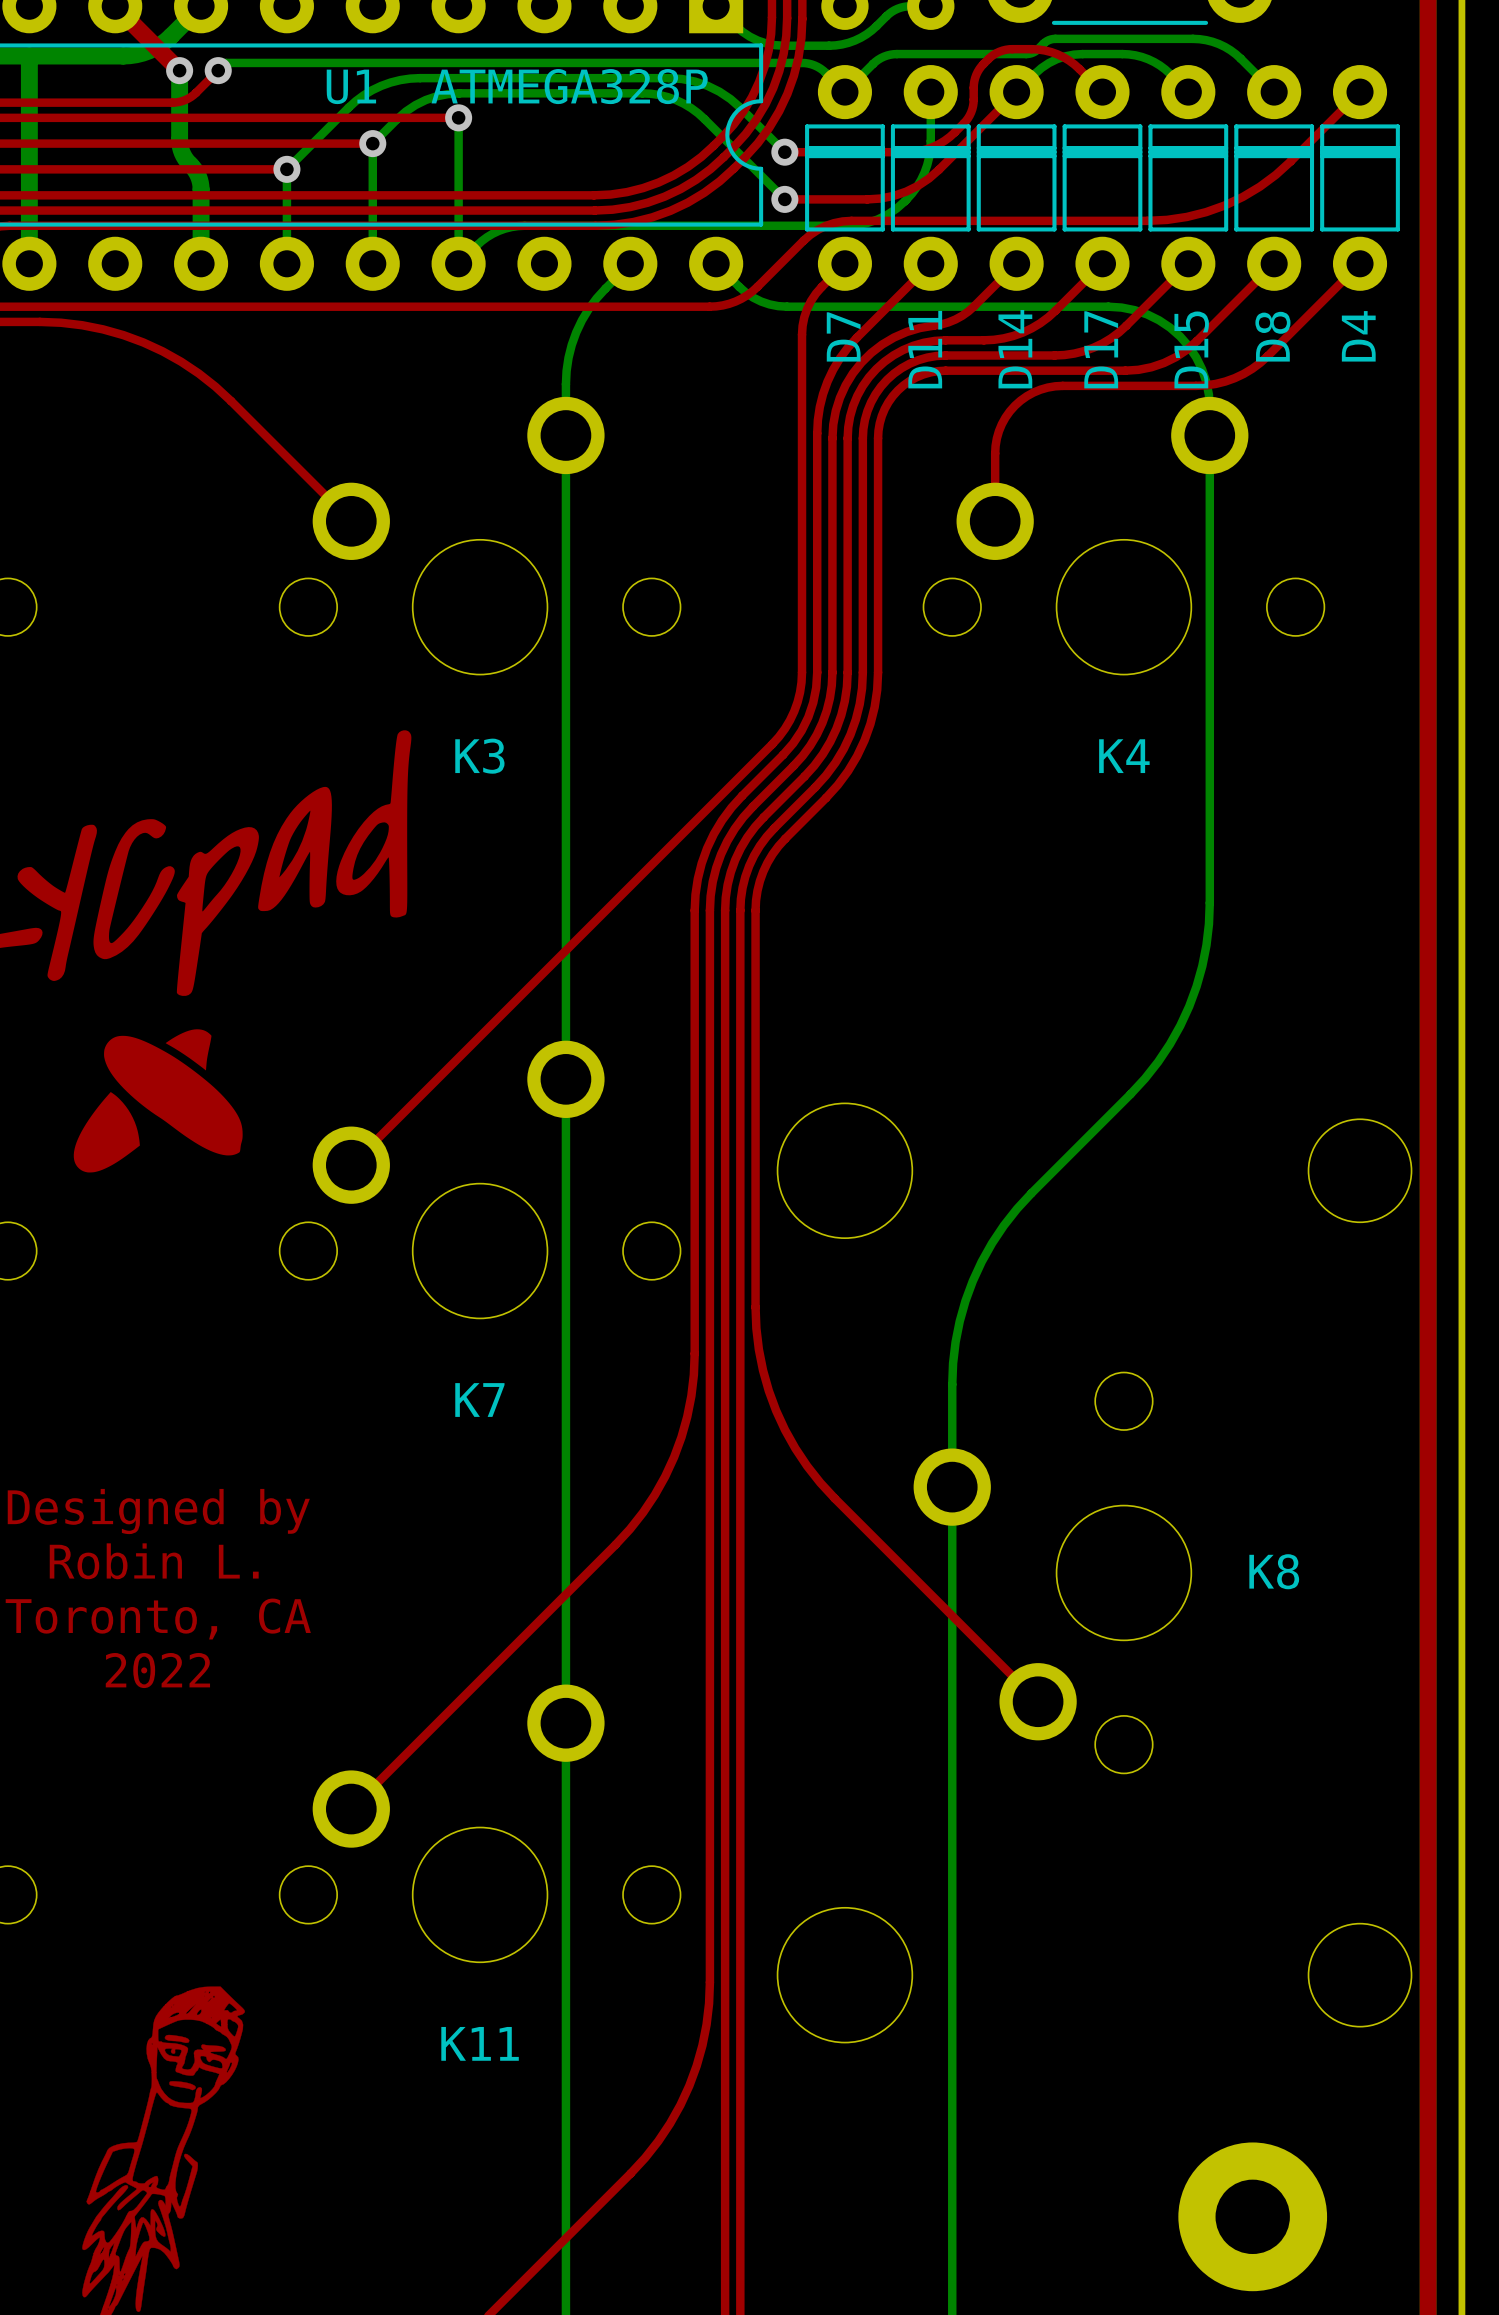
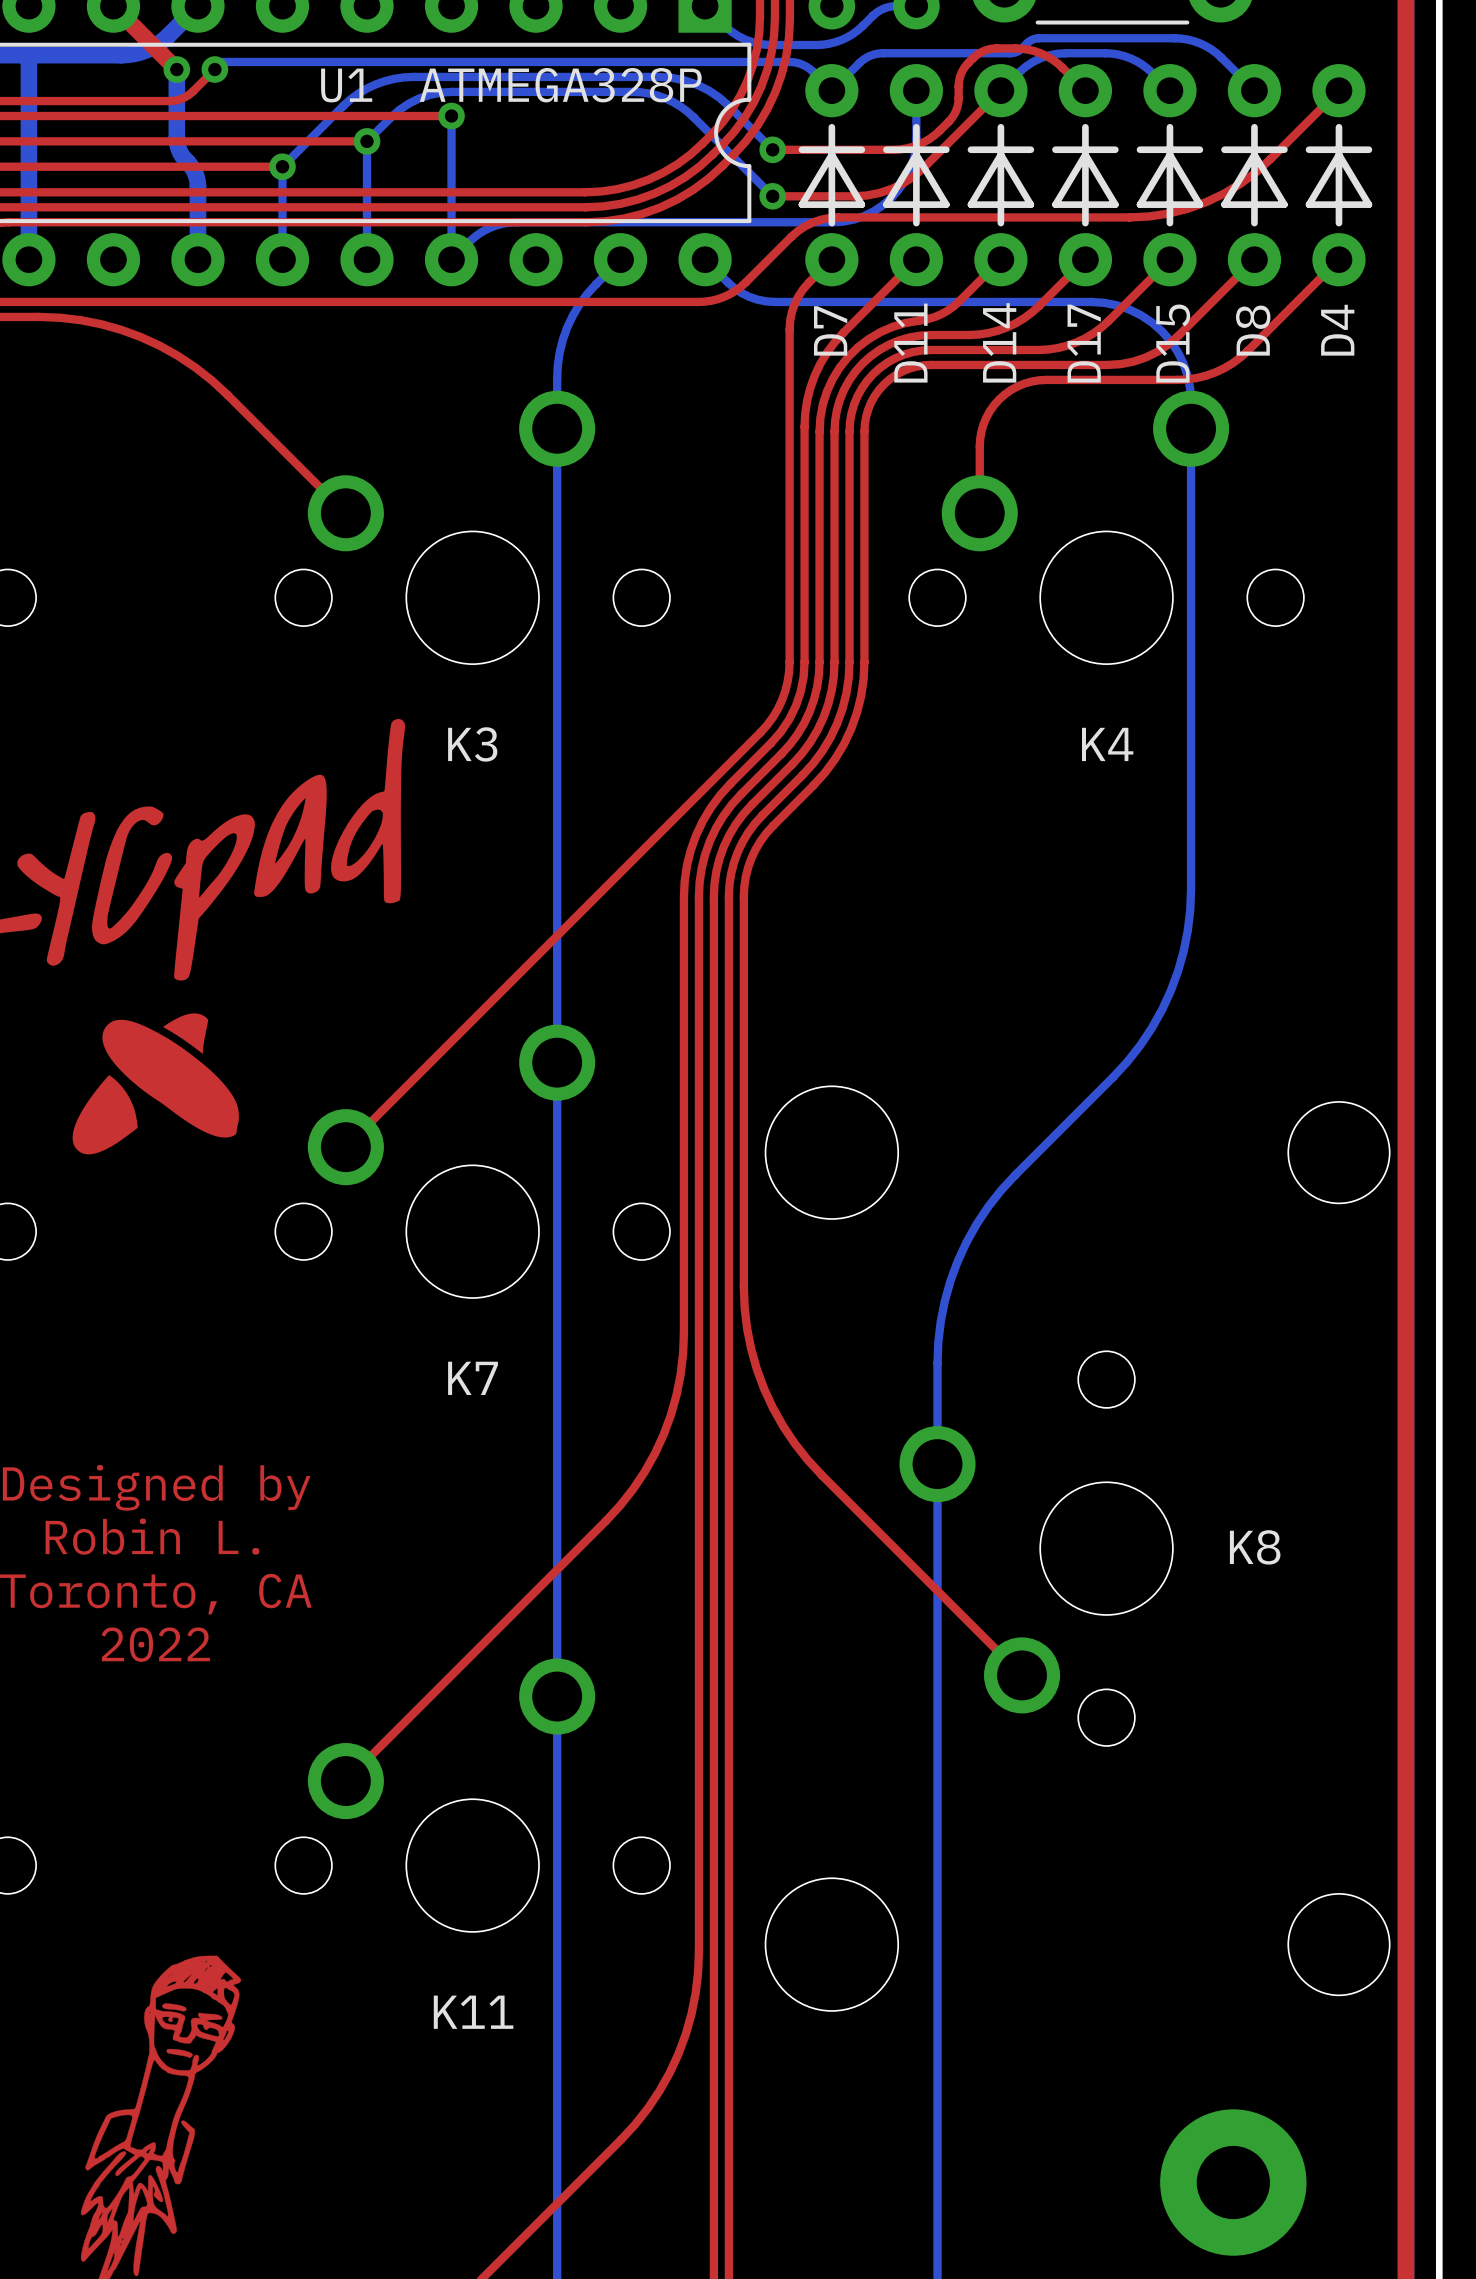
D7 footprint: [805, 65, 885, 291] -> [798, 64, 866, 287]
D11 footprint: [890, 65, 971, 291] -> [883, 64, 950, 287]
D14 footprint: [976, 65, 1057, 291] -> [967, 64, 1035, 287]
D17 footprint: [1062, 65, 1143, 291] -> [1052, 64, 1119, 287]
D15 footprint: [1148, 65, 1229, 291] -> [1136, 64, 1204, 287]
D8 footprint: [1234, 65, 1315, 291] -> [1221, 64, 1288, 287]
D4 footprint: [1320, 65, 1400, 291] -> [1305, 64, 1373, 287]

